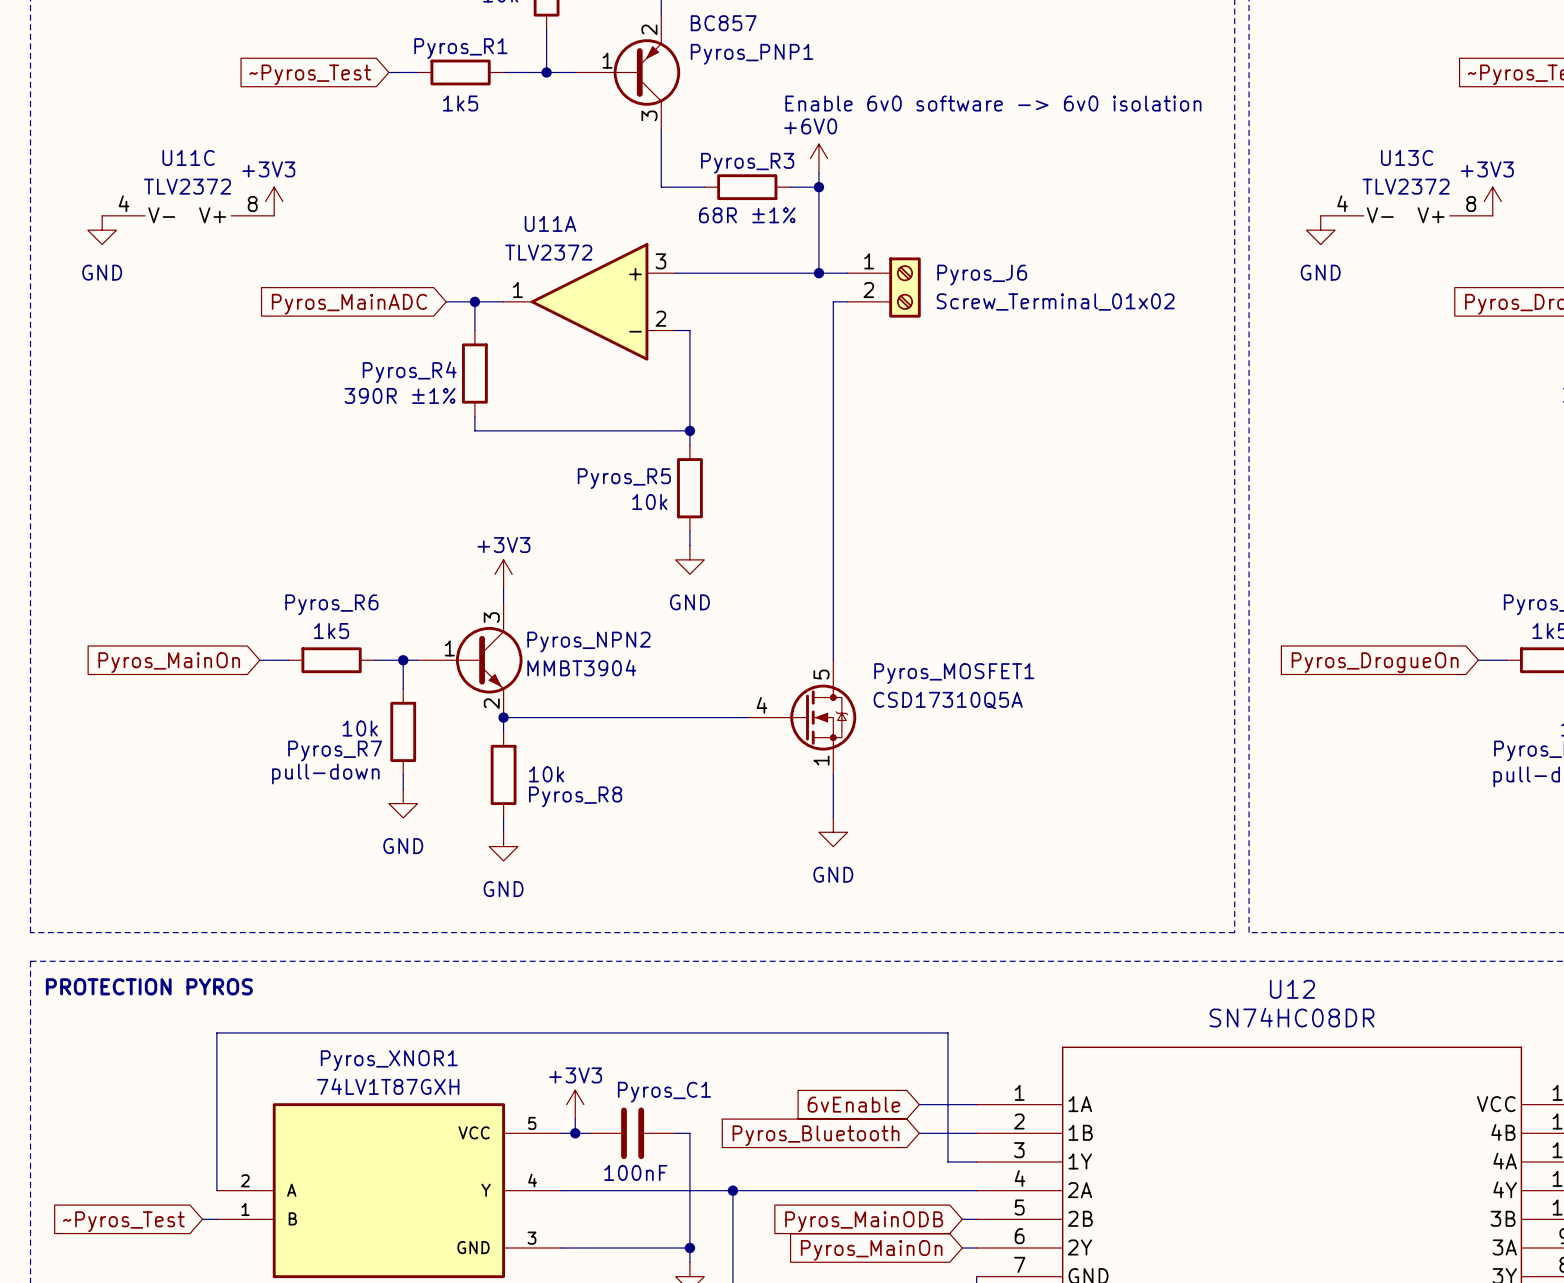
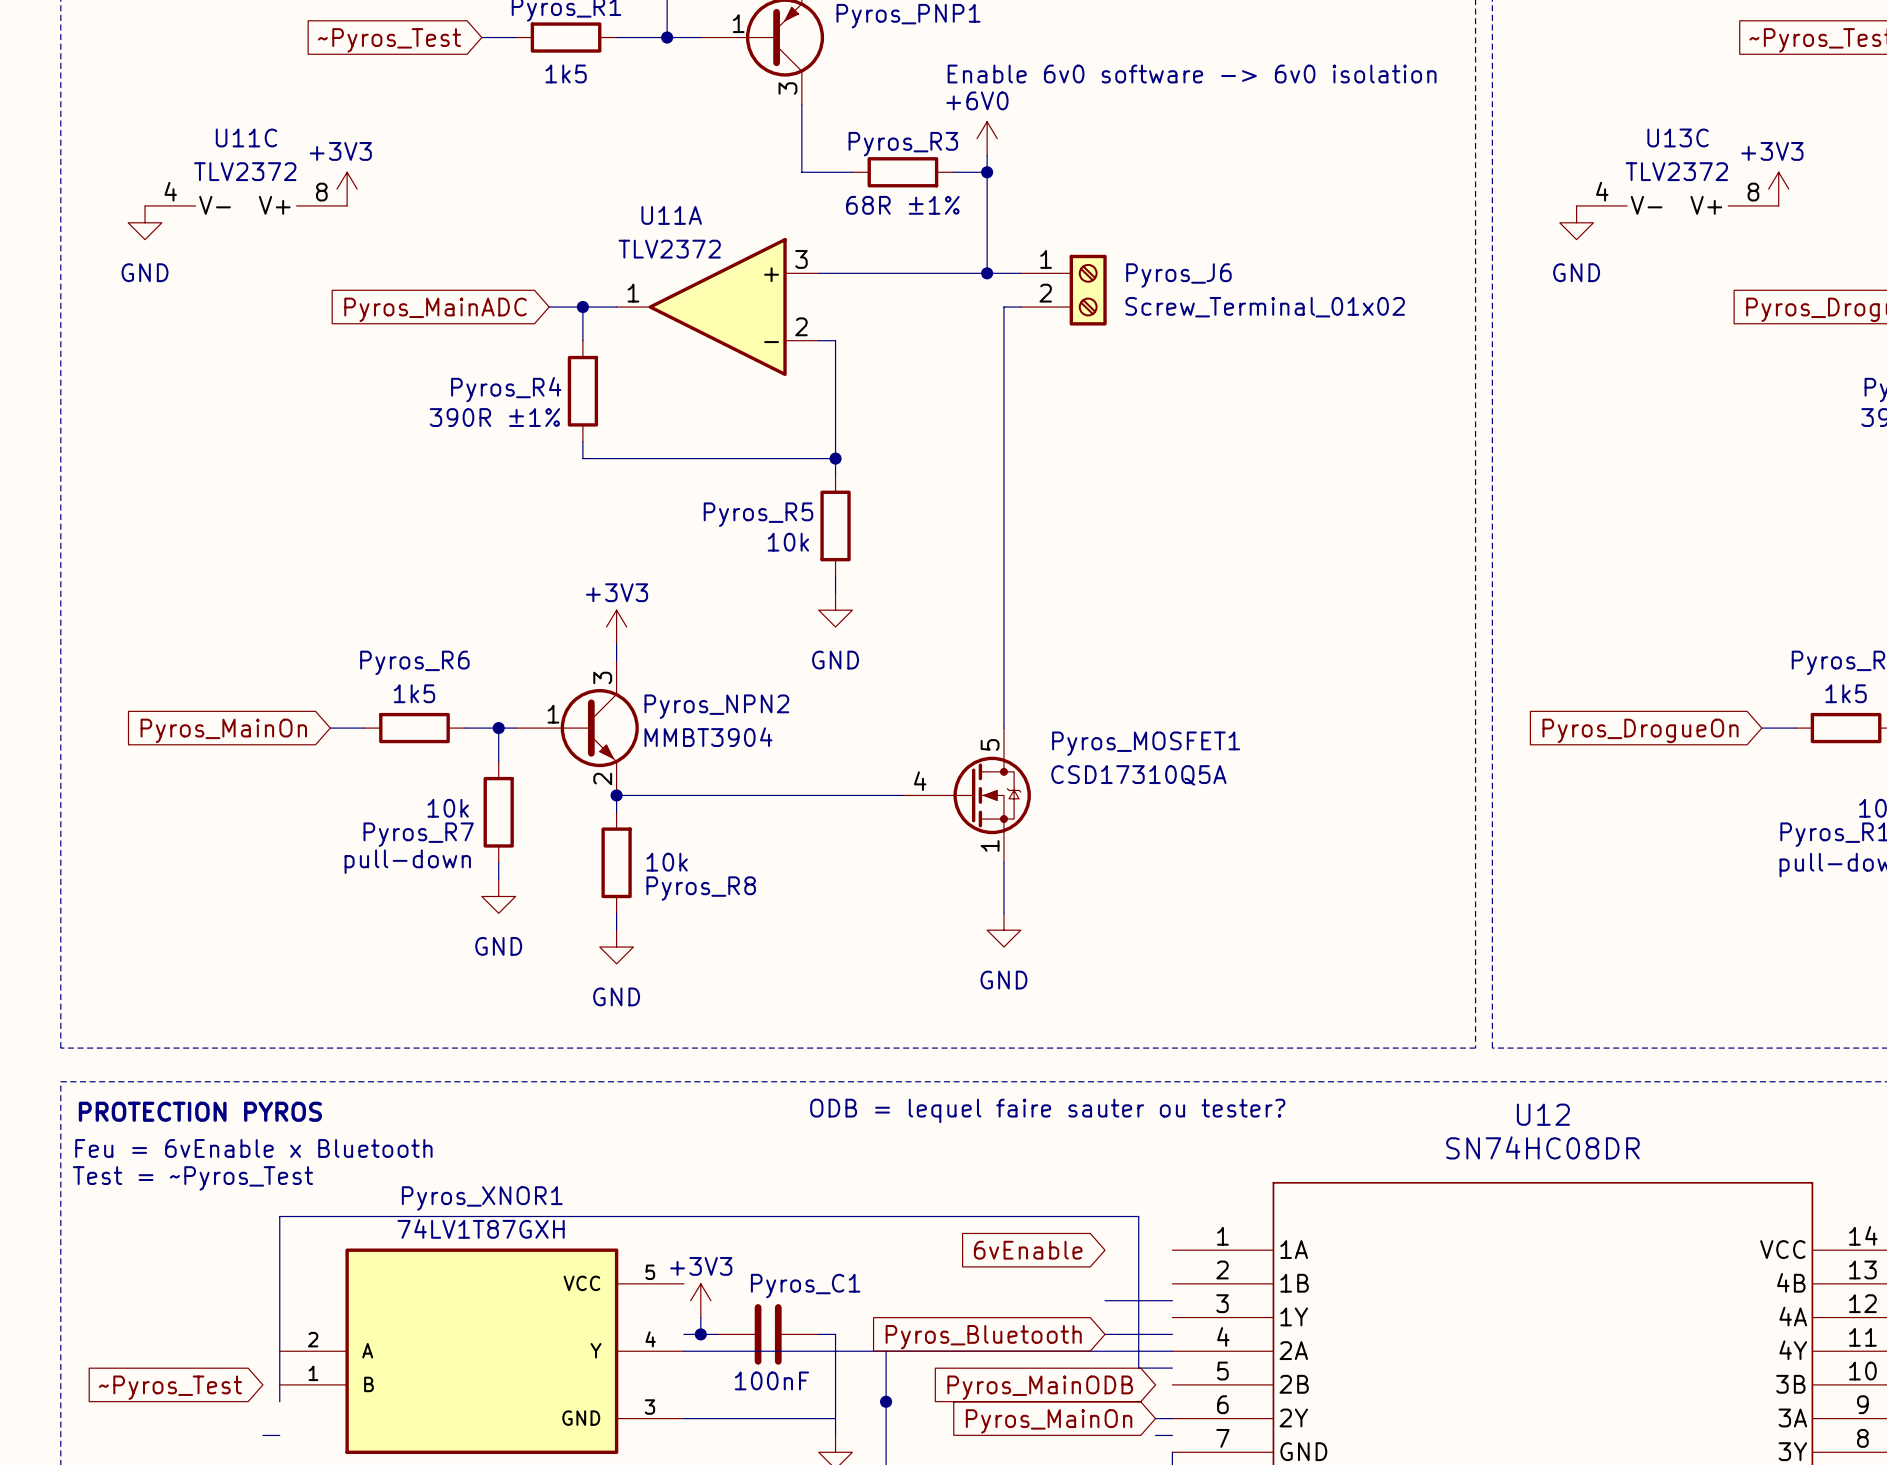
text: none -> ODB = lequel faire sauter ou tester? (1047, 1110)
text: none -> Feu = 6vEnable x Bluetooth (253, 1148)
text: none -> Test = ~Pyros_Test (192, 1178)
wire: (216, 1075) (216, 1032) (947, 1032) (947, 1075) -> (279, 1216) (1138, 1216)
power symbol position: +3V3 (575, 1104) -> +3V3 (700, 1300)
wire: (919, 1104) (976, 1104) -> (1105, 1300) (1172, 1300)
wire: (575, 1118) (575, 1133) -> (700, 1317) (700, 1334)
wire: (560, 1133) (589, 1133) -> (683, 1334) (717, 1334)
junction position: (575, 1133) -> (700, 1334)
Pyros_C1 position: (632, 1133) -> (768, 1334)
wire: (675, 1133) (689, 1133) (689, 1176) -> (818, 1334) (835, 1334)
wire: (919, 1133) (976, 1133) -> (1105, 1334) (1172, 1334)
global label position: Pyros_Bluetooth (816, 1135) -> Pyros_Bluetooth (983, 1337)
wire: (947, 1161) (976, 1161) -> (1138, 1317) (1138, 1368) (1172, 1368)
wire: none -> (279, 1351) (279, 1401)
junction: (732, 1190) -> none
wire: (202, 1219) (216, 1219) -> (262, 1435) (279, 1435)
wire: (962, 1219) (976, 1219) -> (1155, 1435) (1172, 1435)
junction: none -> (886, 1401)
junction: (689, 1248) -> none

